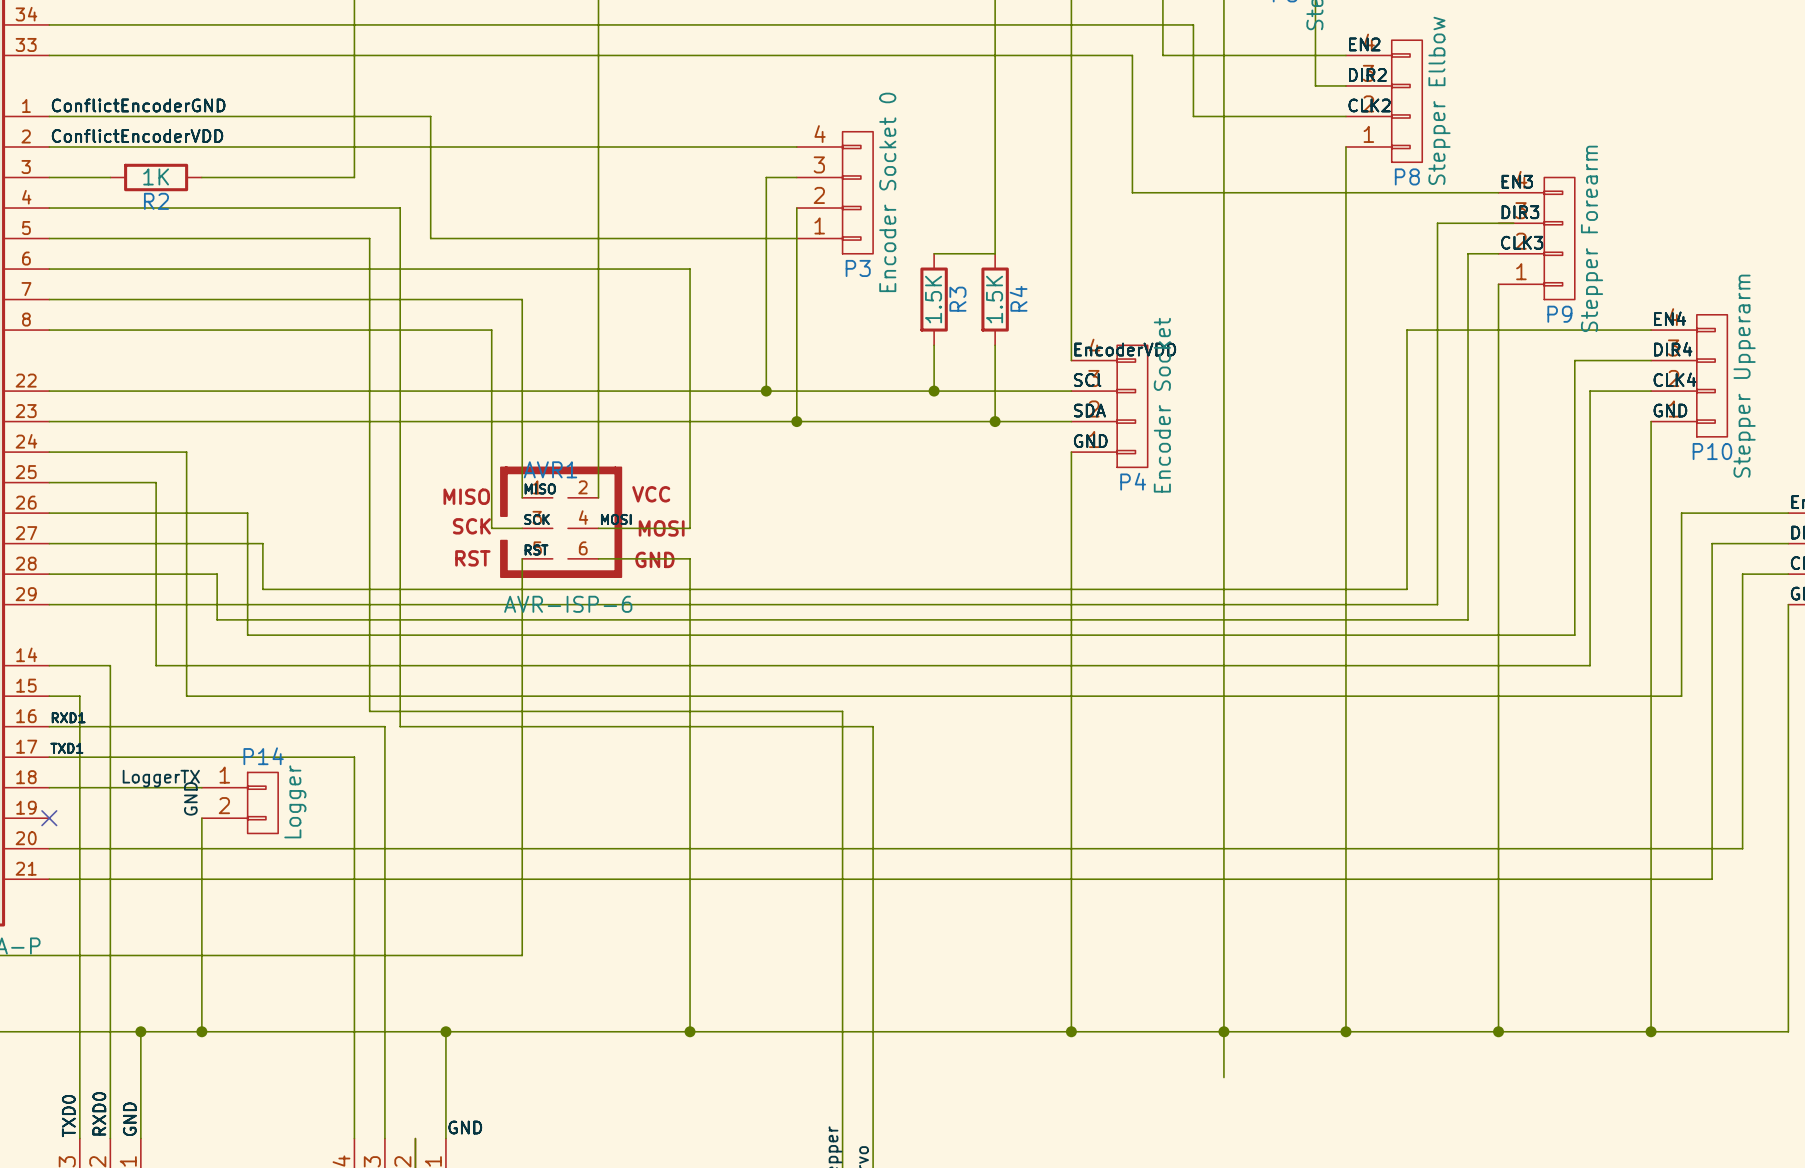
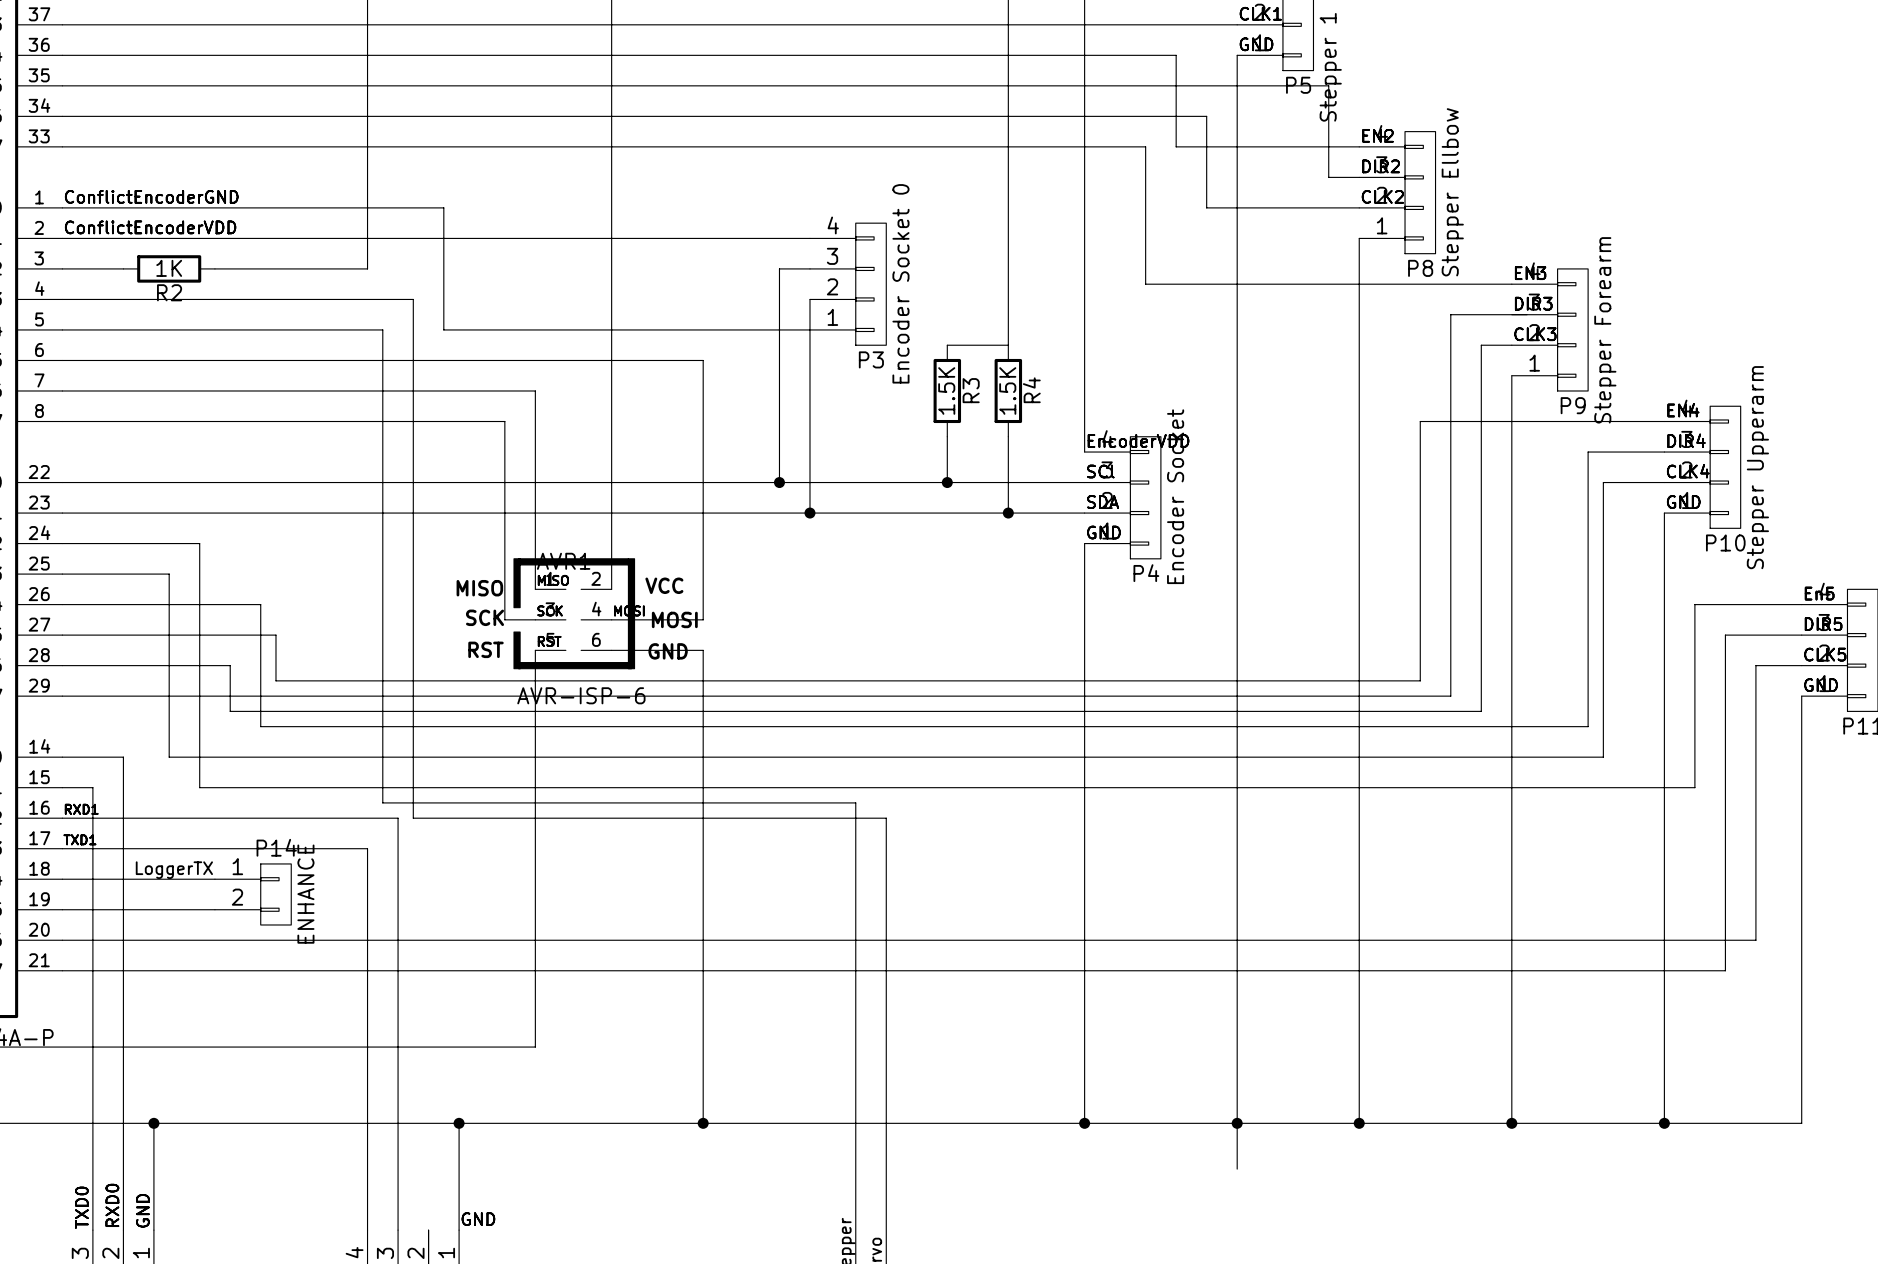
label: GND (190, 798) -> none
P14 value: Logger (295, 801) -> ENHANCE (305, 894)
no-connect mark: (49, 818) -> none
wire: (201, 818) (201, 1031) -> (214, 909) (62, 909)
junction: (201, 1031) -> none

